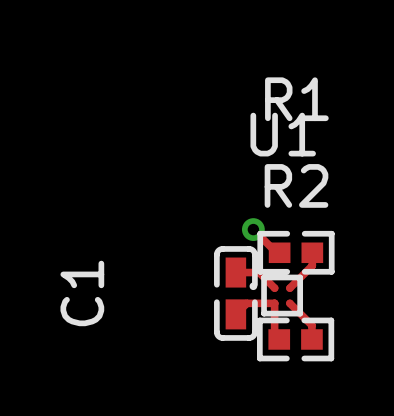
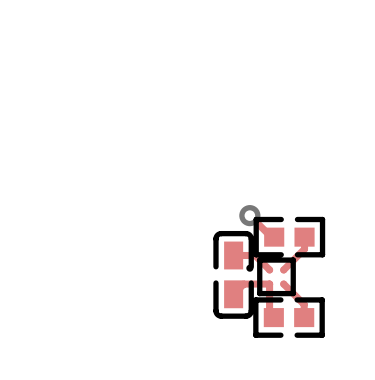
R1 name: R1 (296, 99) -> none
U1 name: U1 (283, 134) -> none
R2 name: R2 (296, 185) -> none
C1 name: C1 (82, 293) -> none

